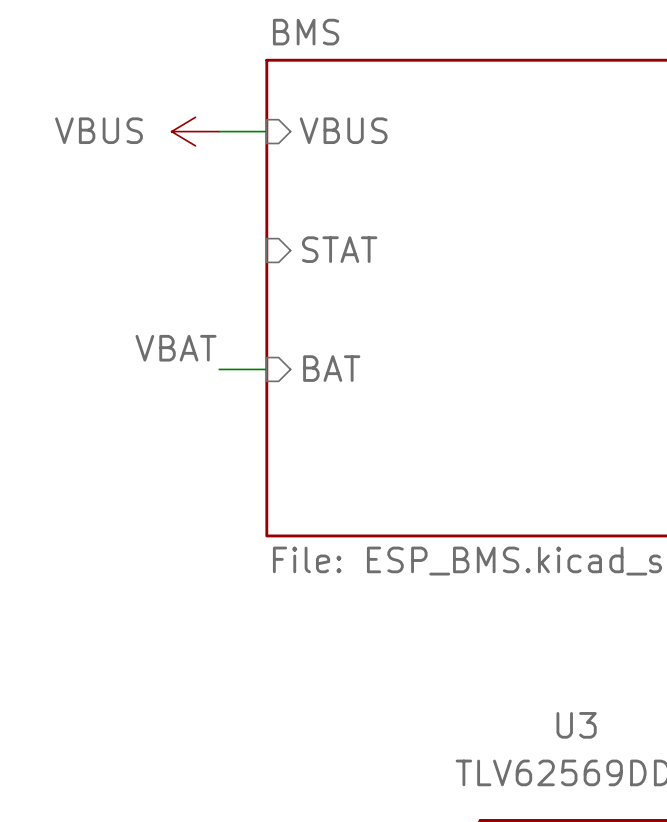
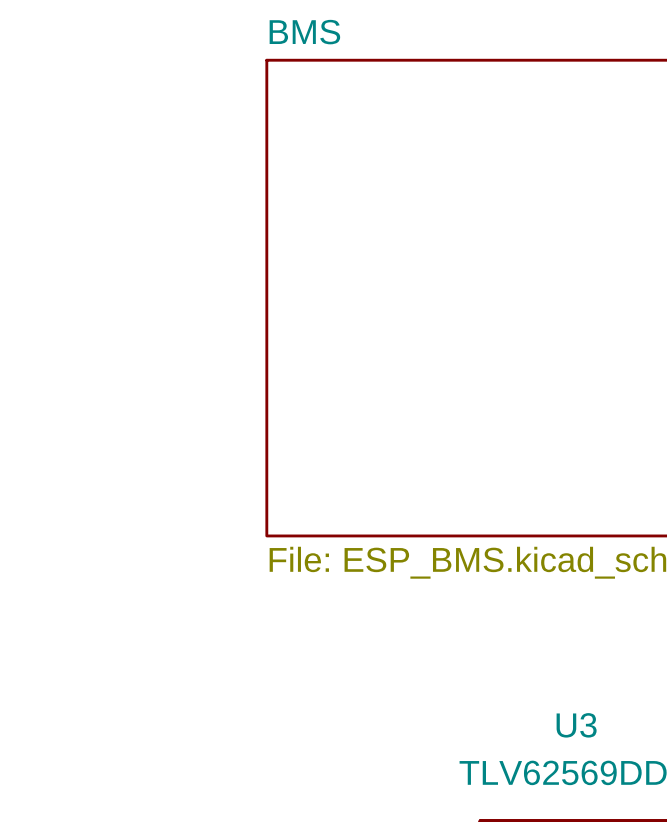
sheet pin: VBUS (343, 130) -> none
power symbol: VBUS (195, 131) -> none
wire: (219, 131) (266, 131) -> none
sheet pin: STAT (339, 249) -> none
label: VBAT (176, 348) -> none
sheet pin: BAT (331, 368) -> none
wire: (219, 369) (266, 369) -> none

